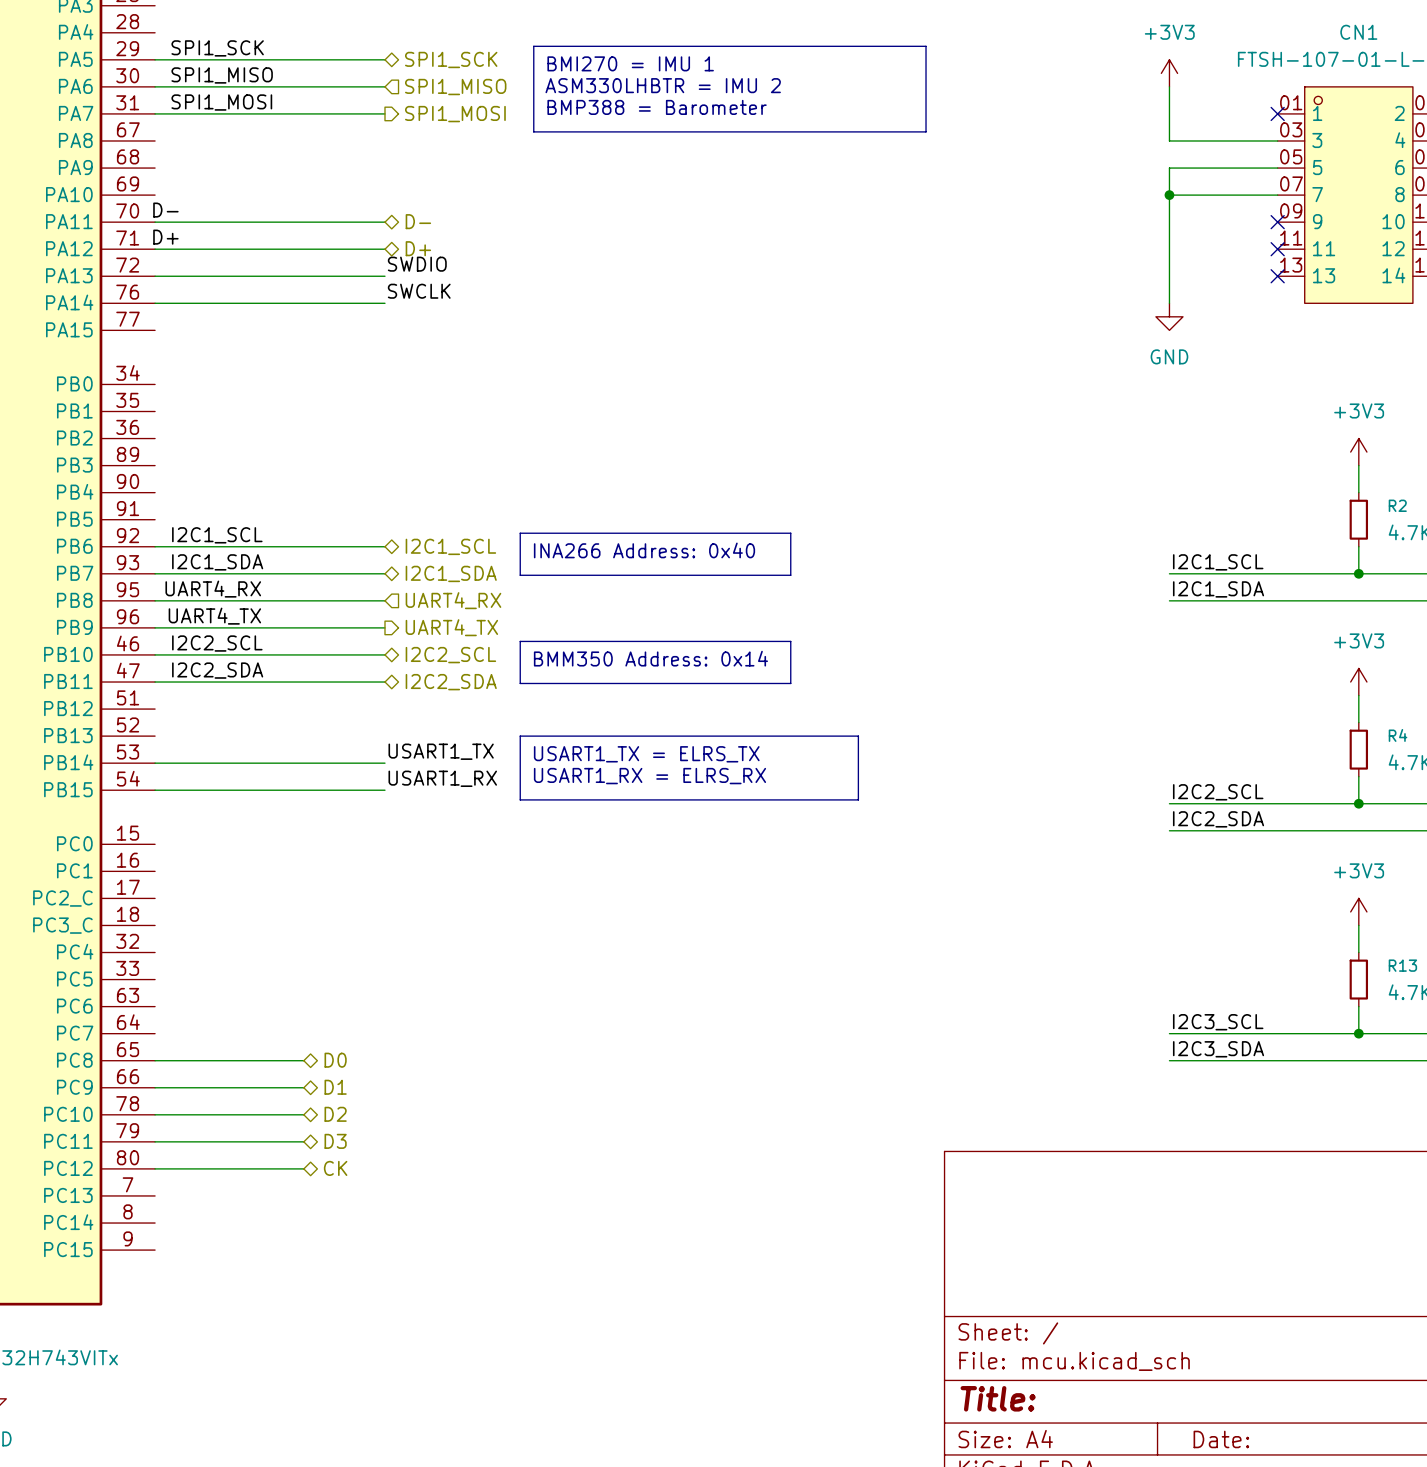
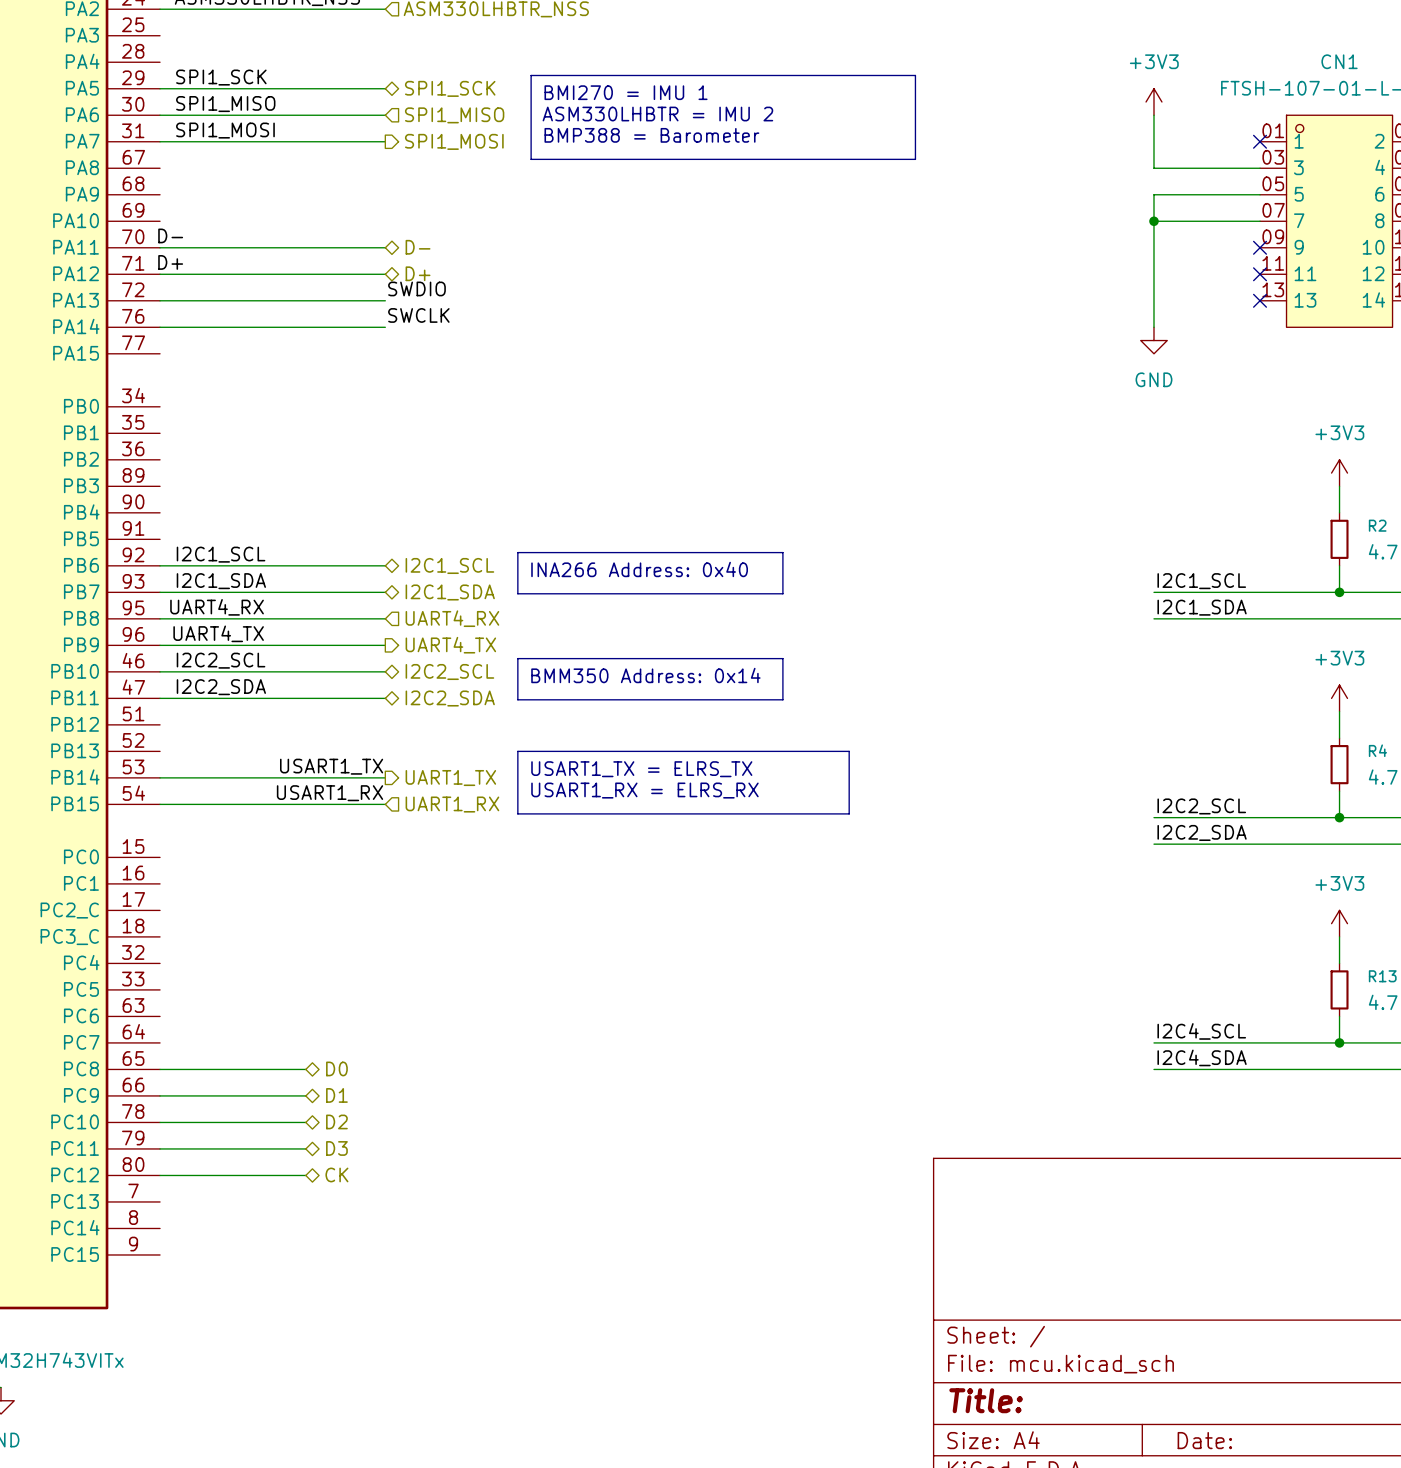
label position: USART1_TX (441, 751) -> USART1_TX (331, 766)
hierarchical label: none -> UART1_TX (450, 778)
label position: USART1_RX (442, 778) -> USART1_RX (330, 793)
hierarchical label: none -> UART1_RX (452, 804)
label: I2C3_SCL (1218, 1022) -> I2C4_SCL (1201, 1031)
label: I2C3_SDA (1218, 1049) -> I2C4_SDA (1202, 1057)

